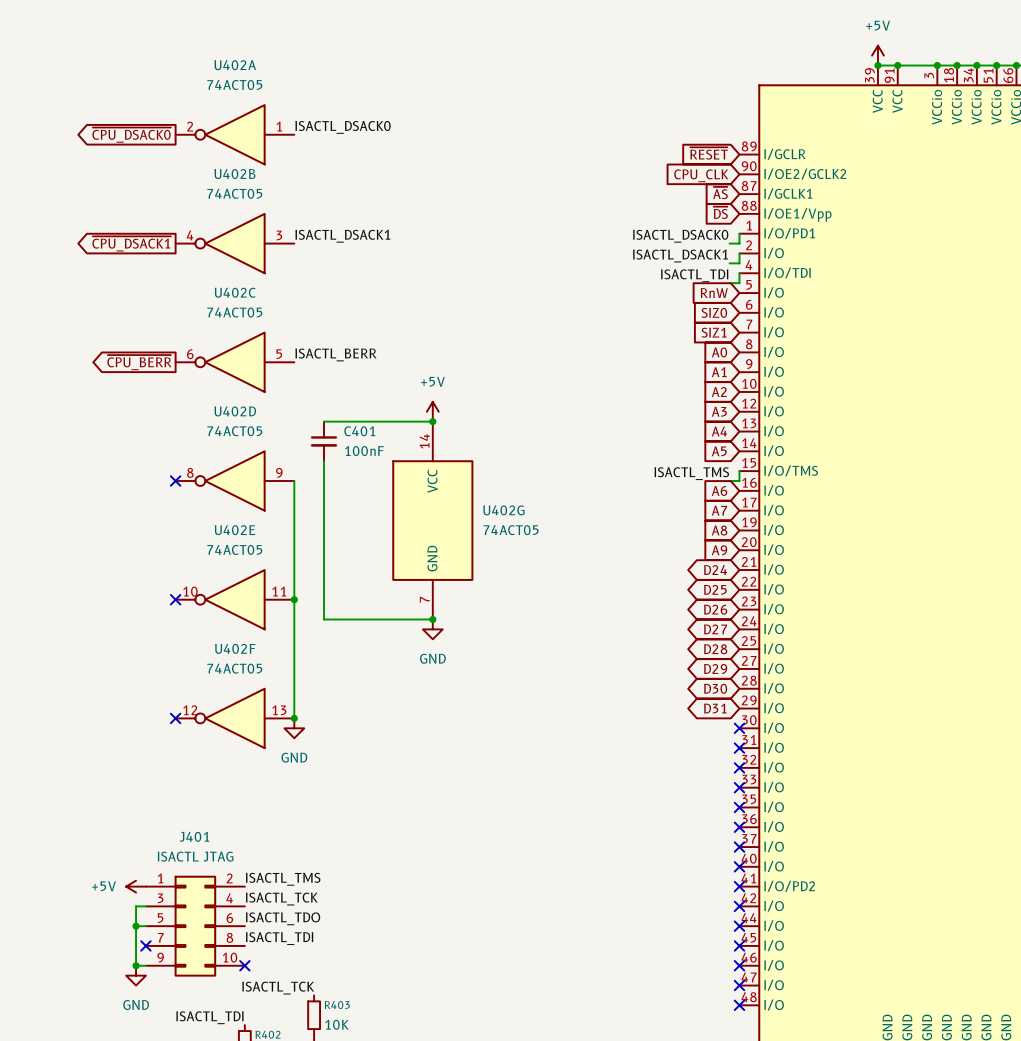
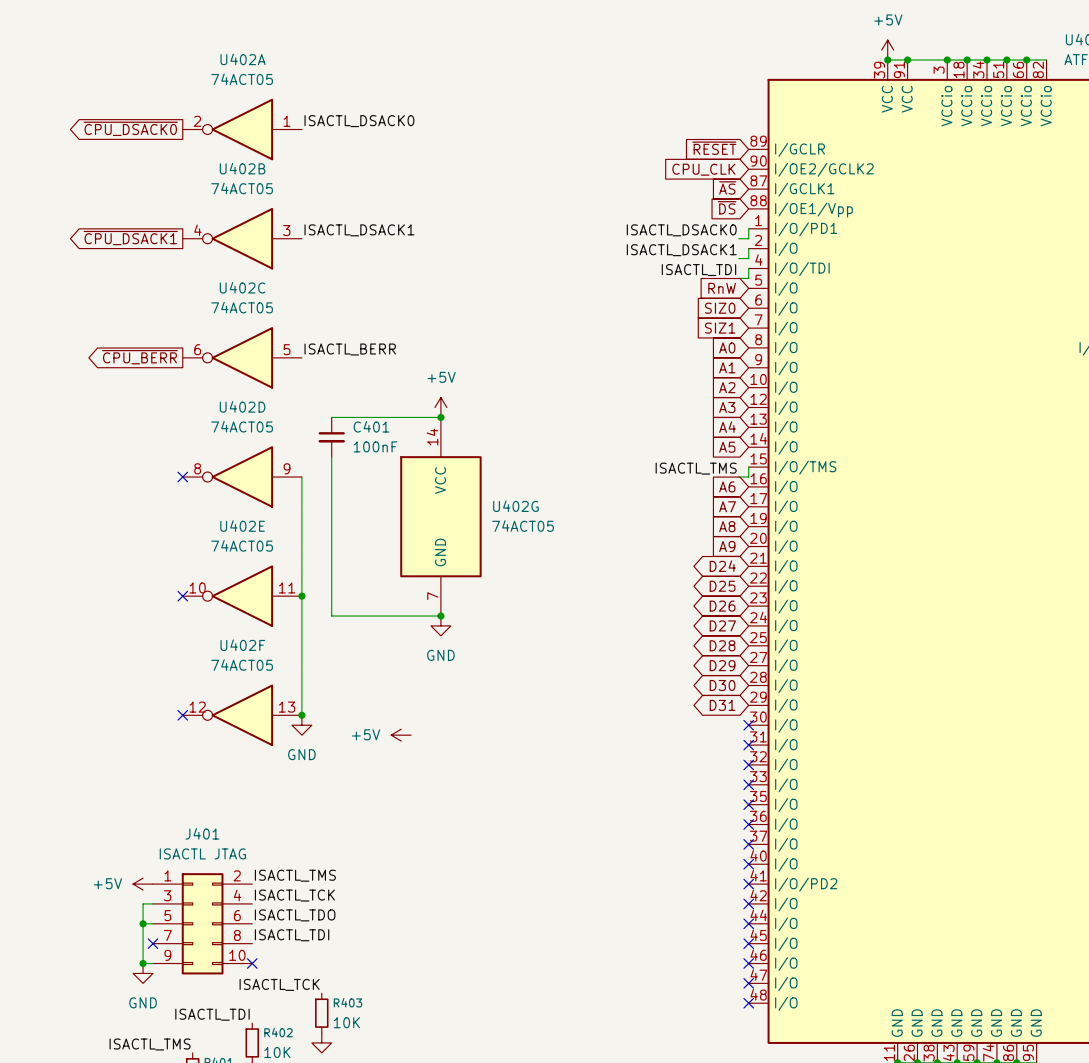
power symbol: none -> +5V (401, 735)

